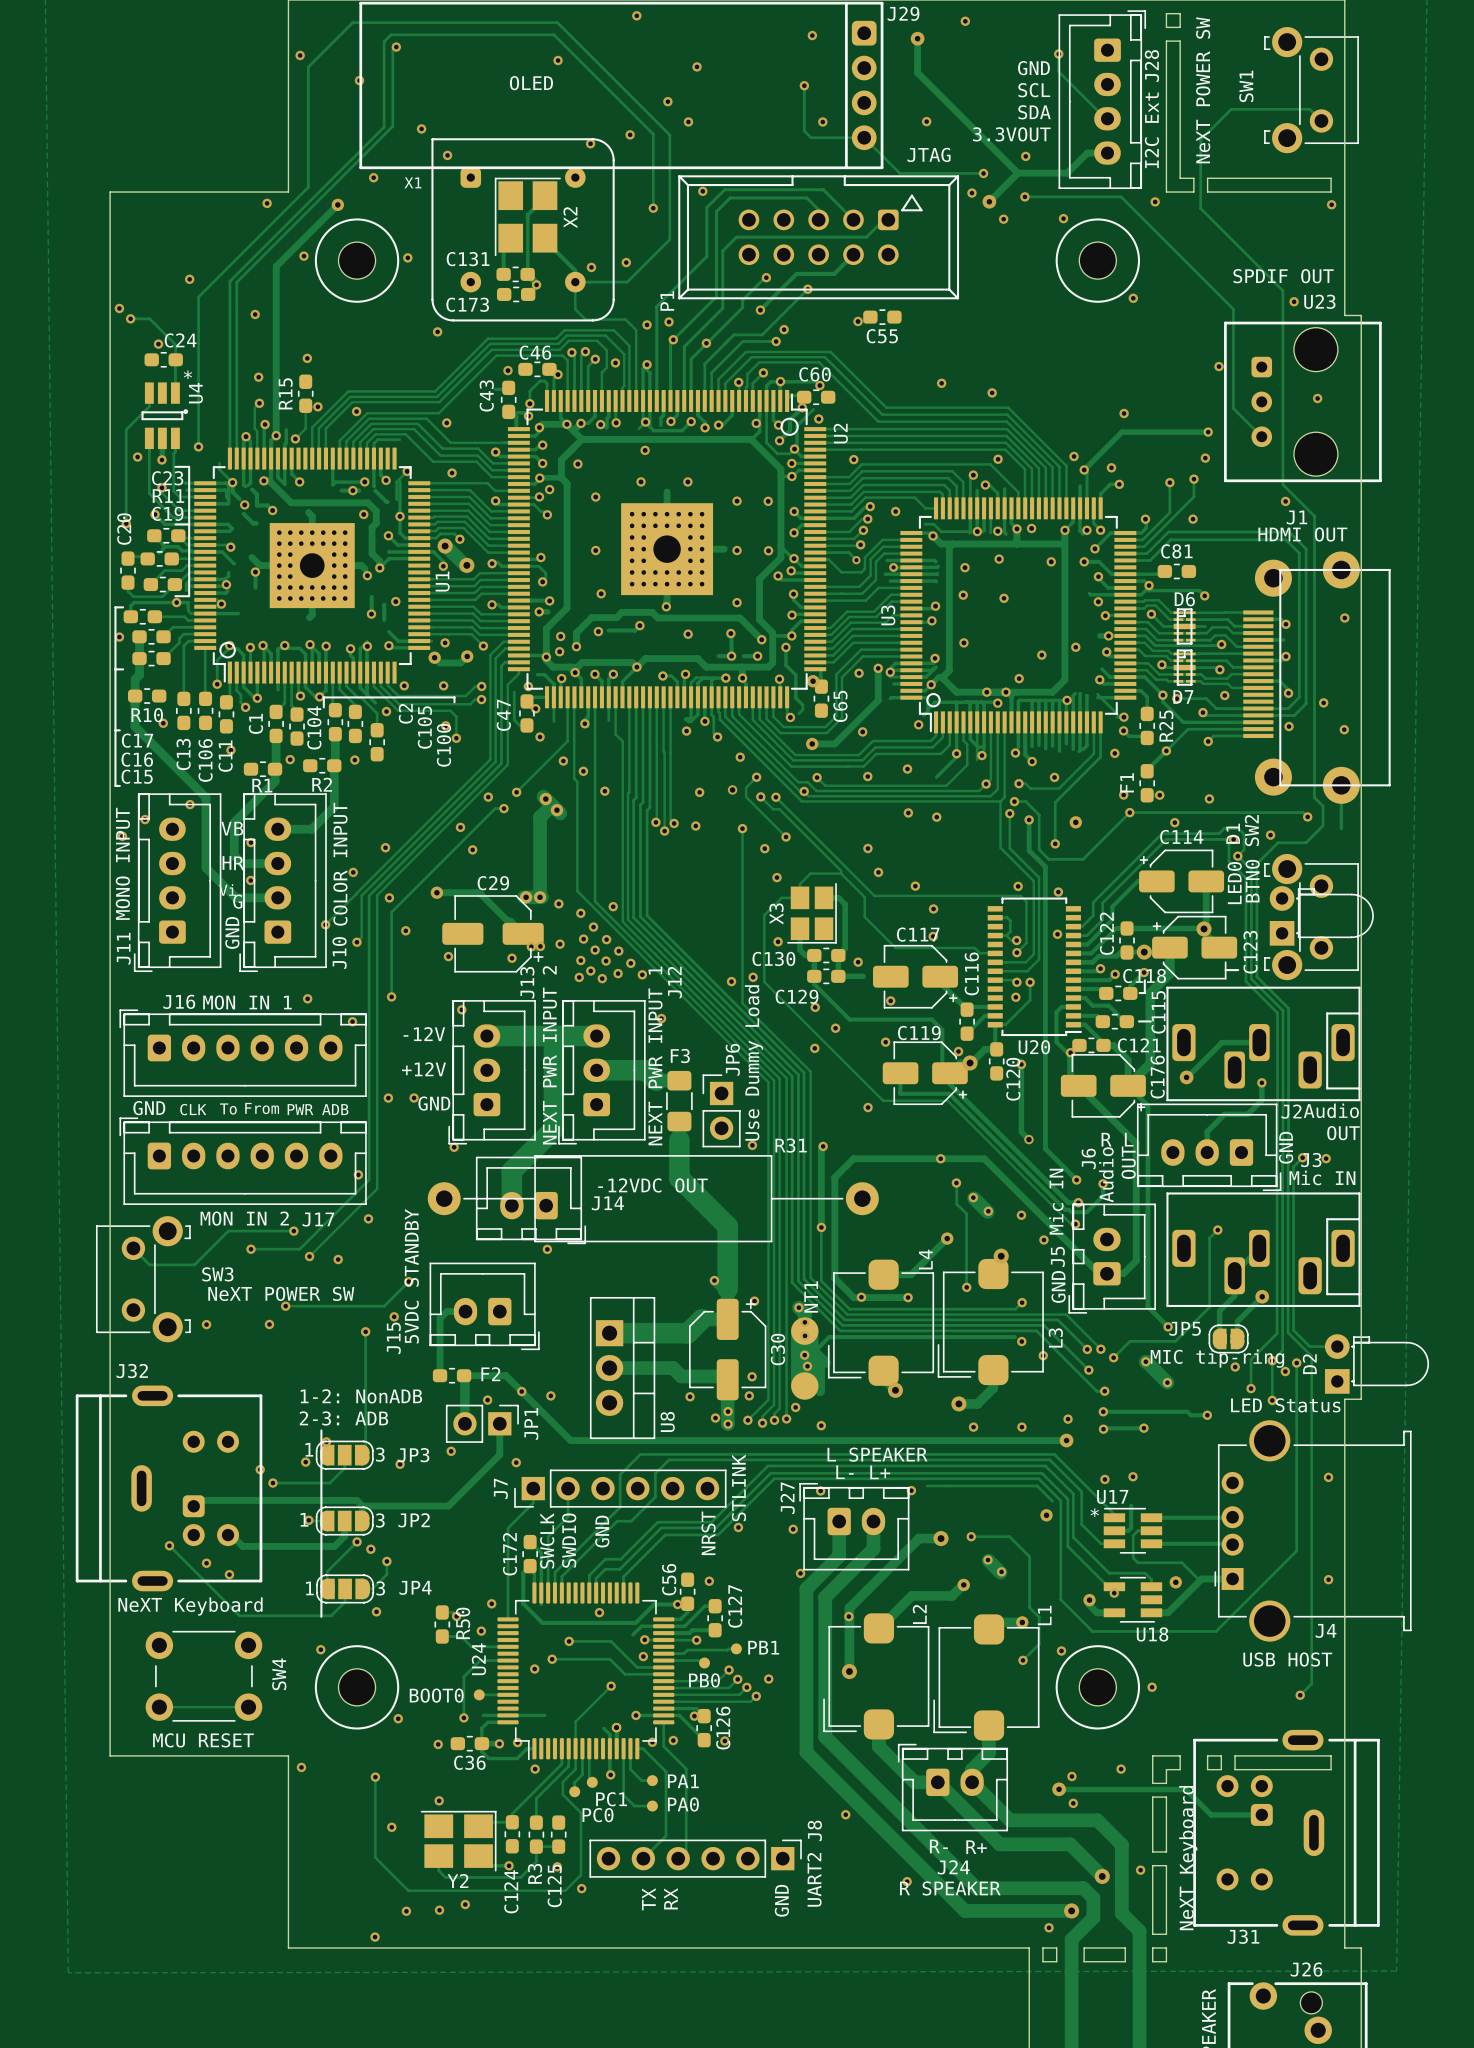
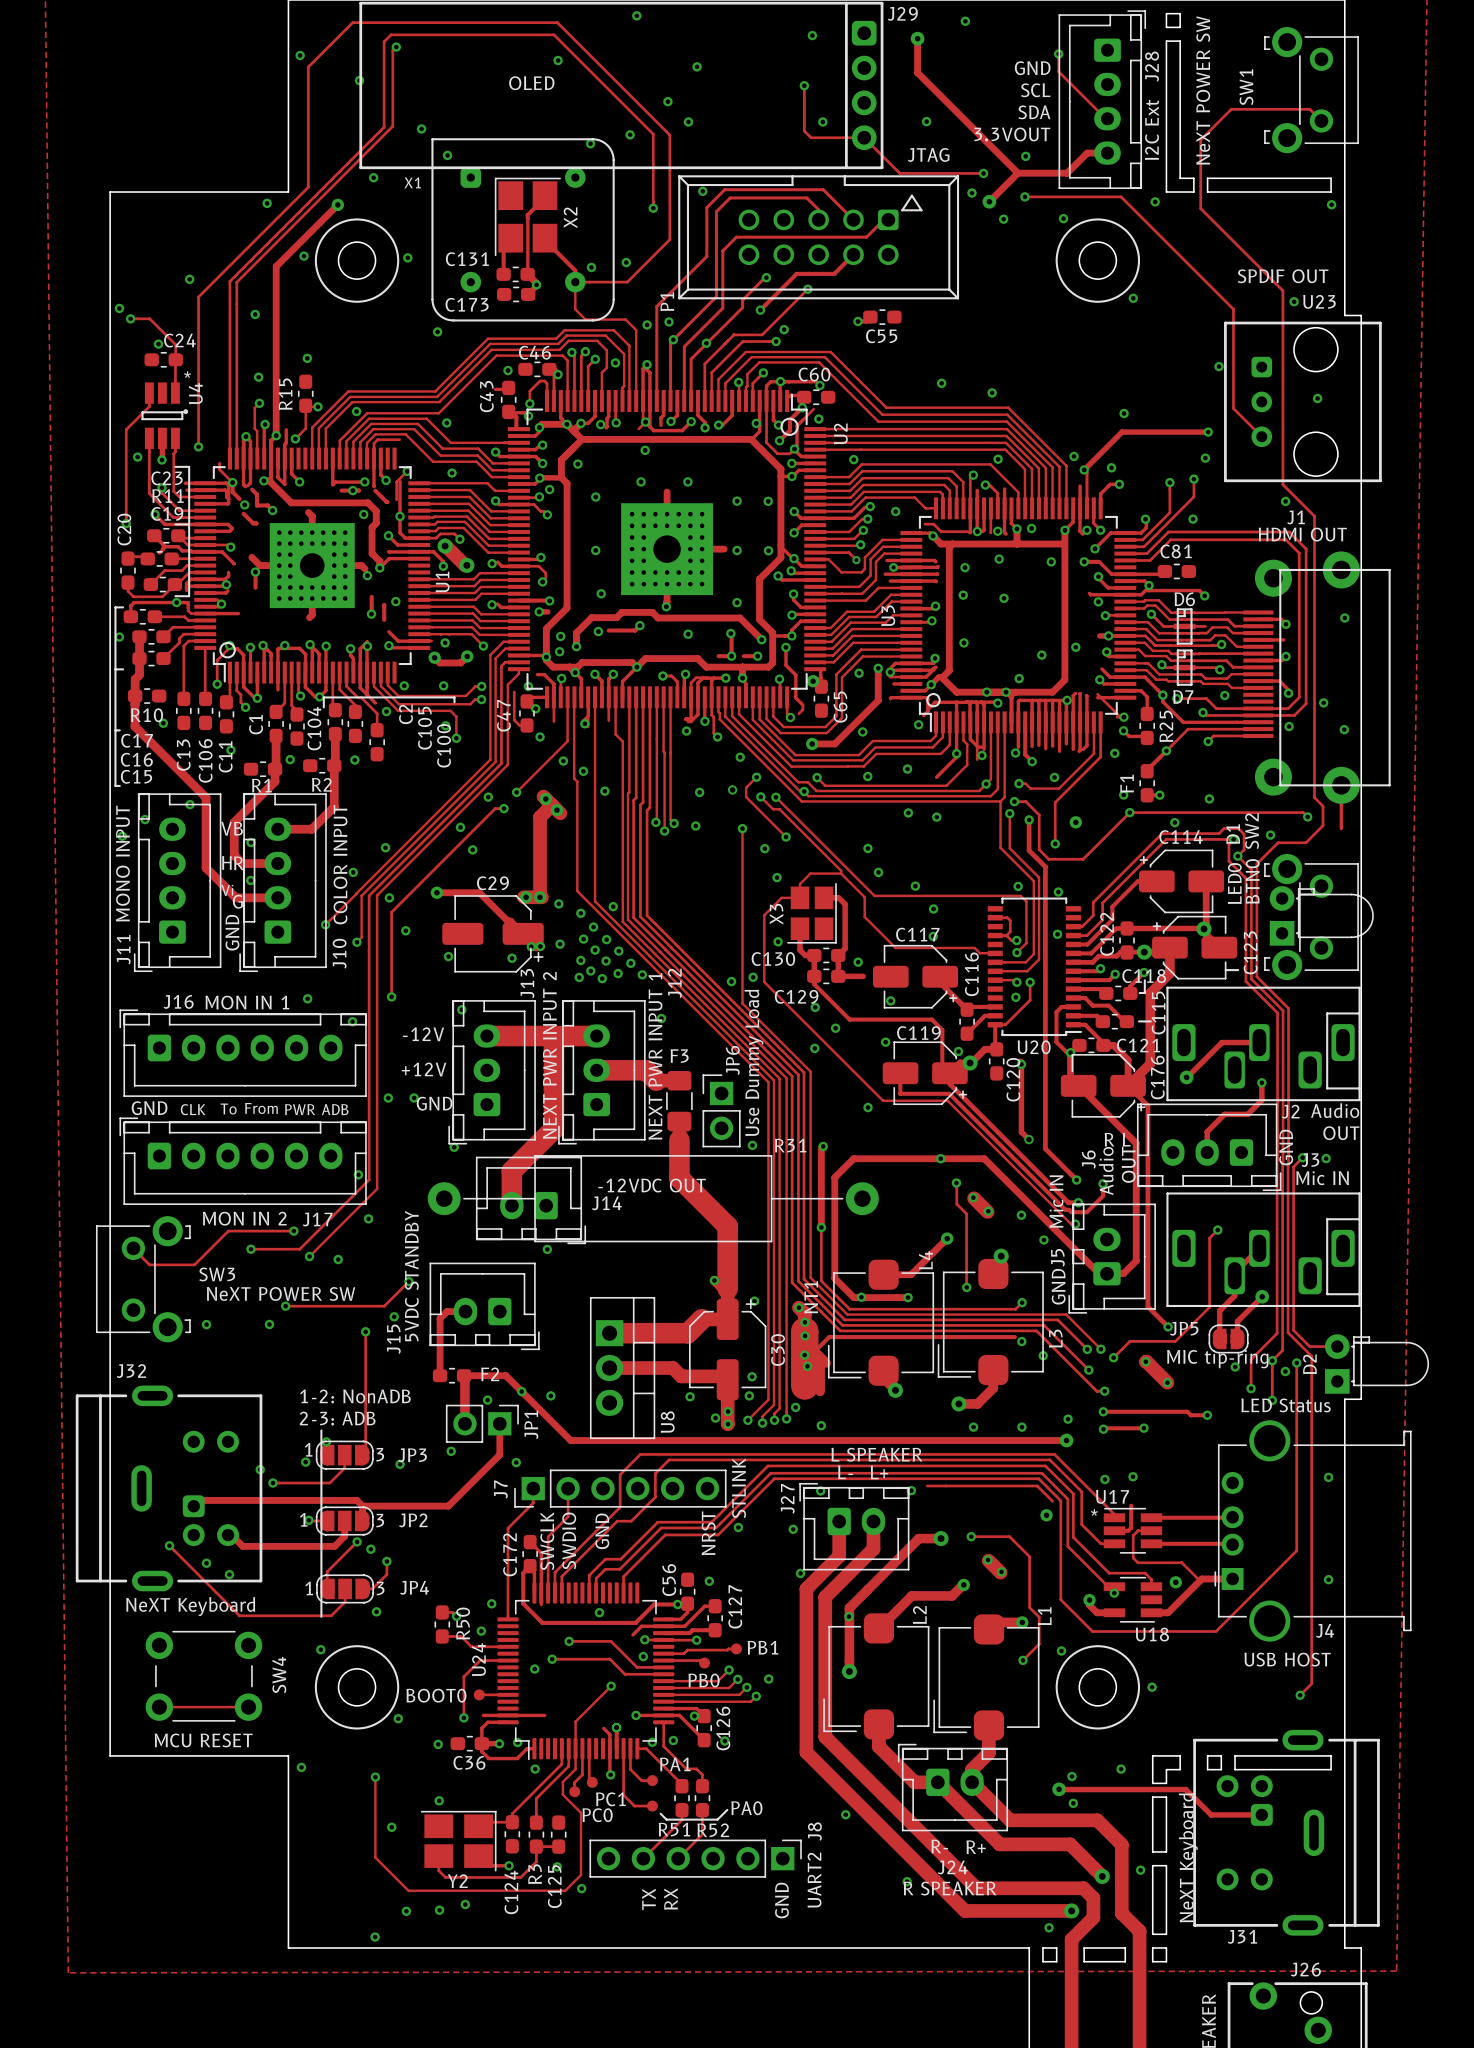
track: (642, 1748) (666, 1771) (666, 1836) -> (642, 1748) (646, 1748) (682, 1786)
track: (686, 1768) (686, 1850) -> (702, 1810) (702, 1834) (686, 1850)
track: none -> (686, 1768) (696, 1768) (702, 1774) (702, 1786)
part value position: PA1 (683, 1781) -> PA1 (675, 1764)
R51: none -> (682, 1798)
R52: none -> (702, 1798)
part value position: PA0 (683, 1804) -> PA0 (746, 1808)
line: none -> (727, 1809) (717, 1819) (666, 1819) (660, 1813)
track: none -> (682, 1810) (682, 1819) (666, 1836)

